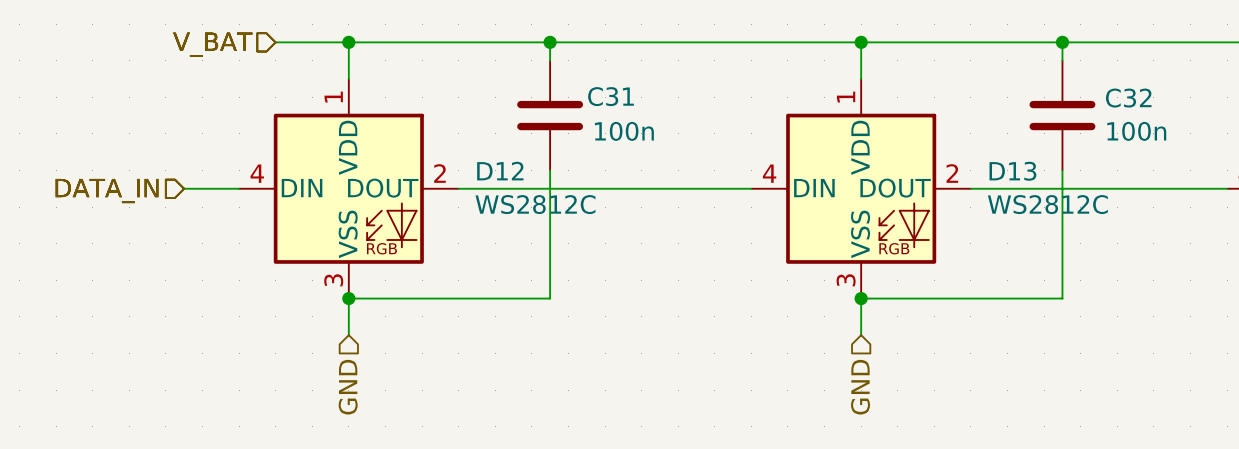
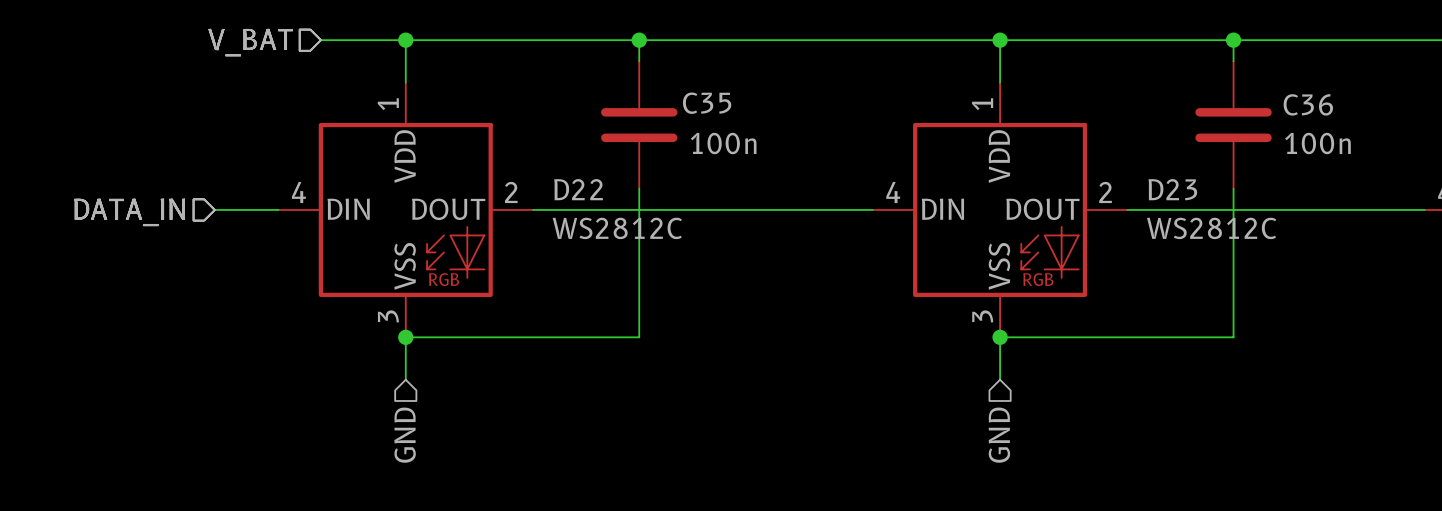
C31 name: C31 (610, 96) -> C35 (707, 103)
C32 name: C32 (1128, 98) -> C36 (1308, 104)
D12 name: D12 (500, 171) -> D22 (578, 189)
D13 name: D13 (1012, 171) -> D23 (1172, 189)

